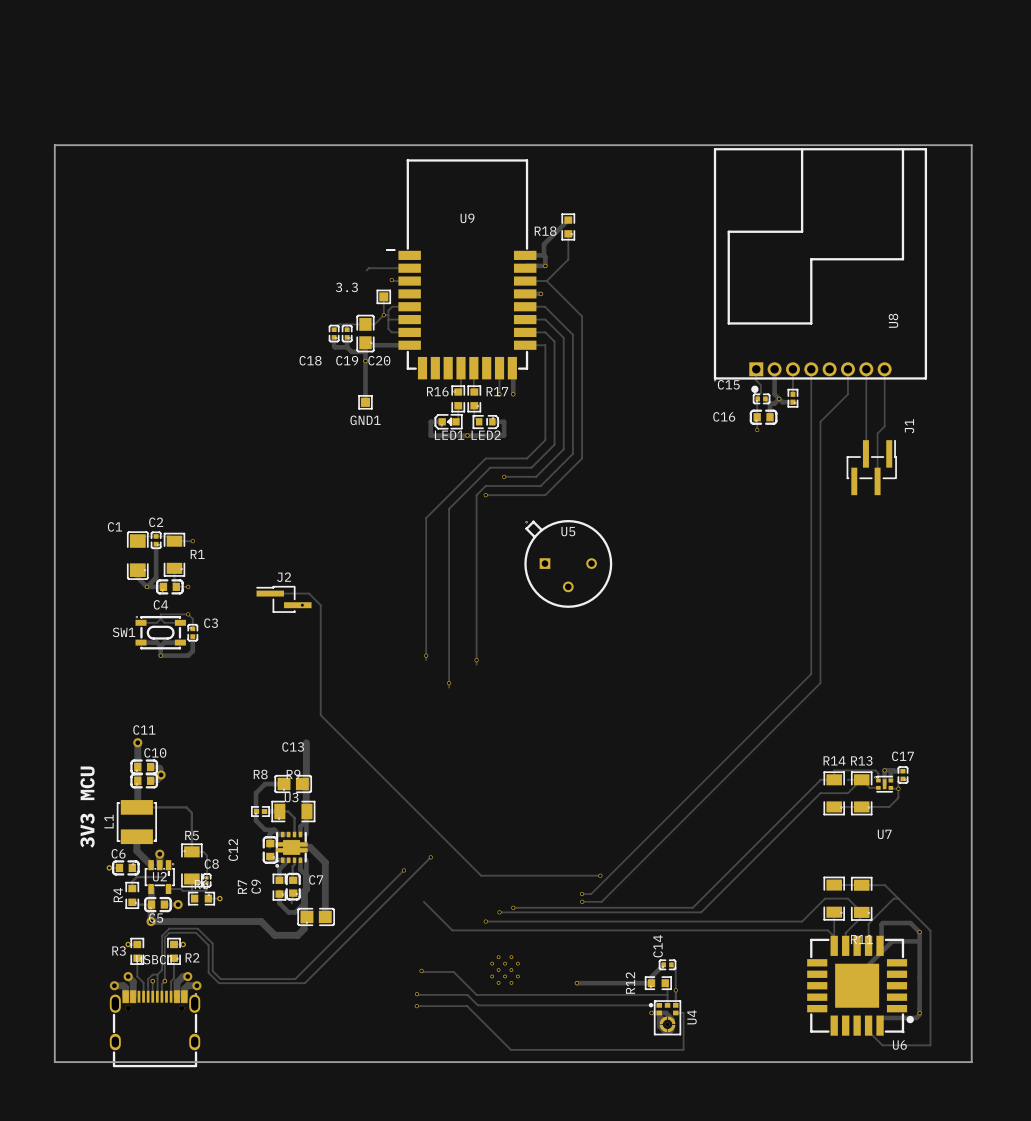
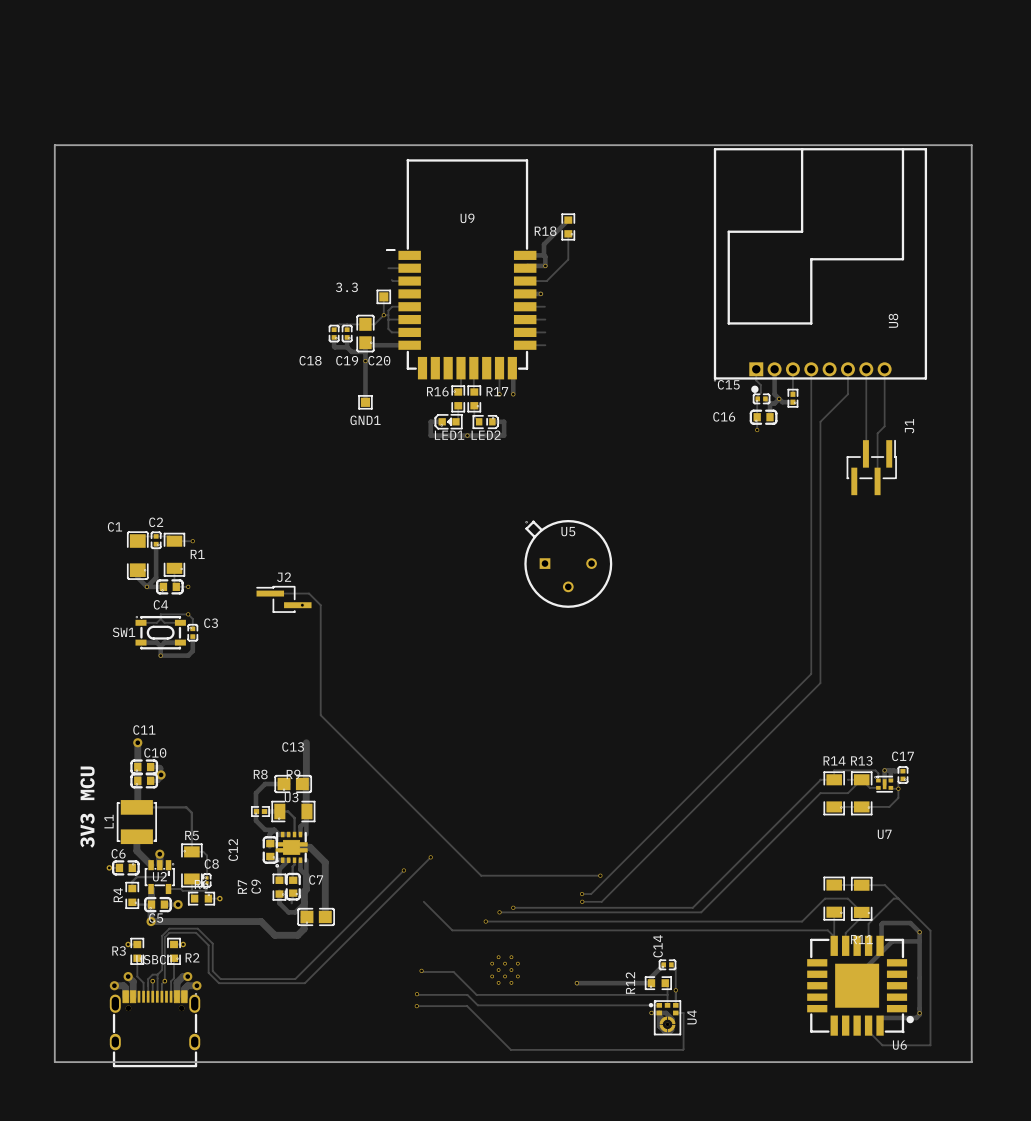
track: (388, 268) (368, 268) (366, 270) -> none
via: (391, 280) -> none
track: (546, 281) (582, 316) (582, 458) (545, 495) (485, 495) -> none
track: (544, 306) (572, 334) (572, 453) (540, 485) (485, 485) (476, 495) (476, 664) -> none
track: (545, 319) (563, 337) (563, 449) (536, 476) (504, 476) -> none
track: (545, 332) (554, 341) (554, 444) (531, 467) (490, 467) (449, 508) (449, 687) -> none
track: (545, 345) (545, 440) (527, 458) (485, 458) (426, 518) (426, 660) -> none
via: (504, 476) -> none
via: (485, 495) -> none
via: (426, 655) -> none
via: (476, 660) -> none
via: (449, 683) -> none

